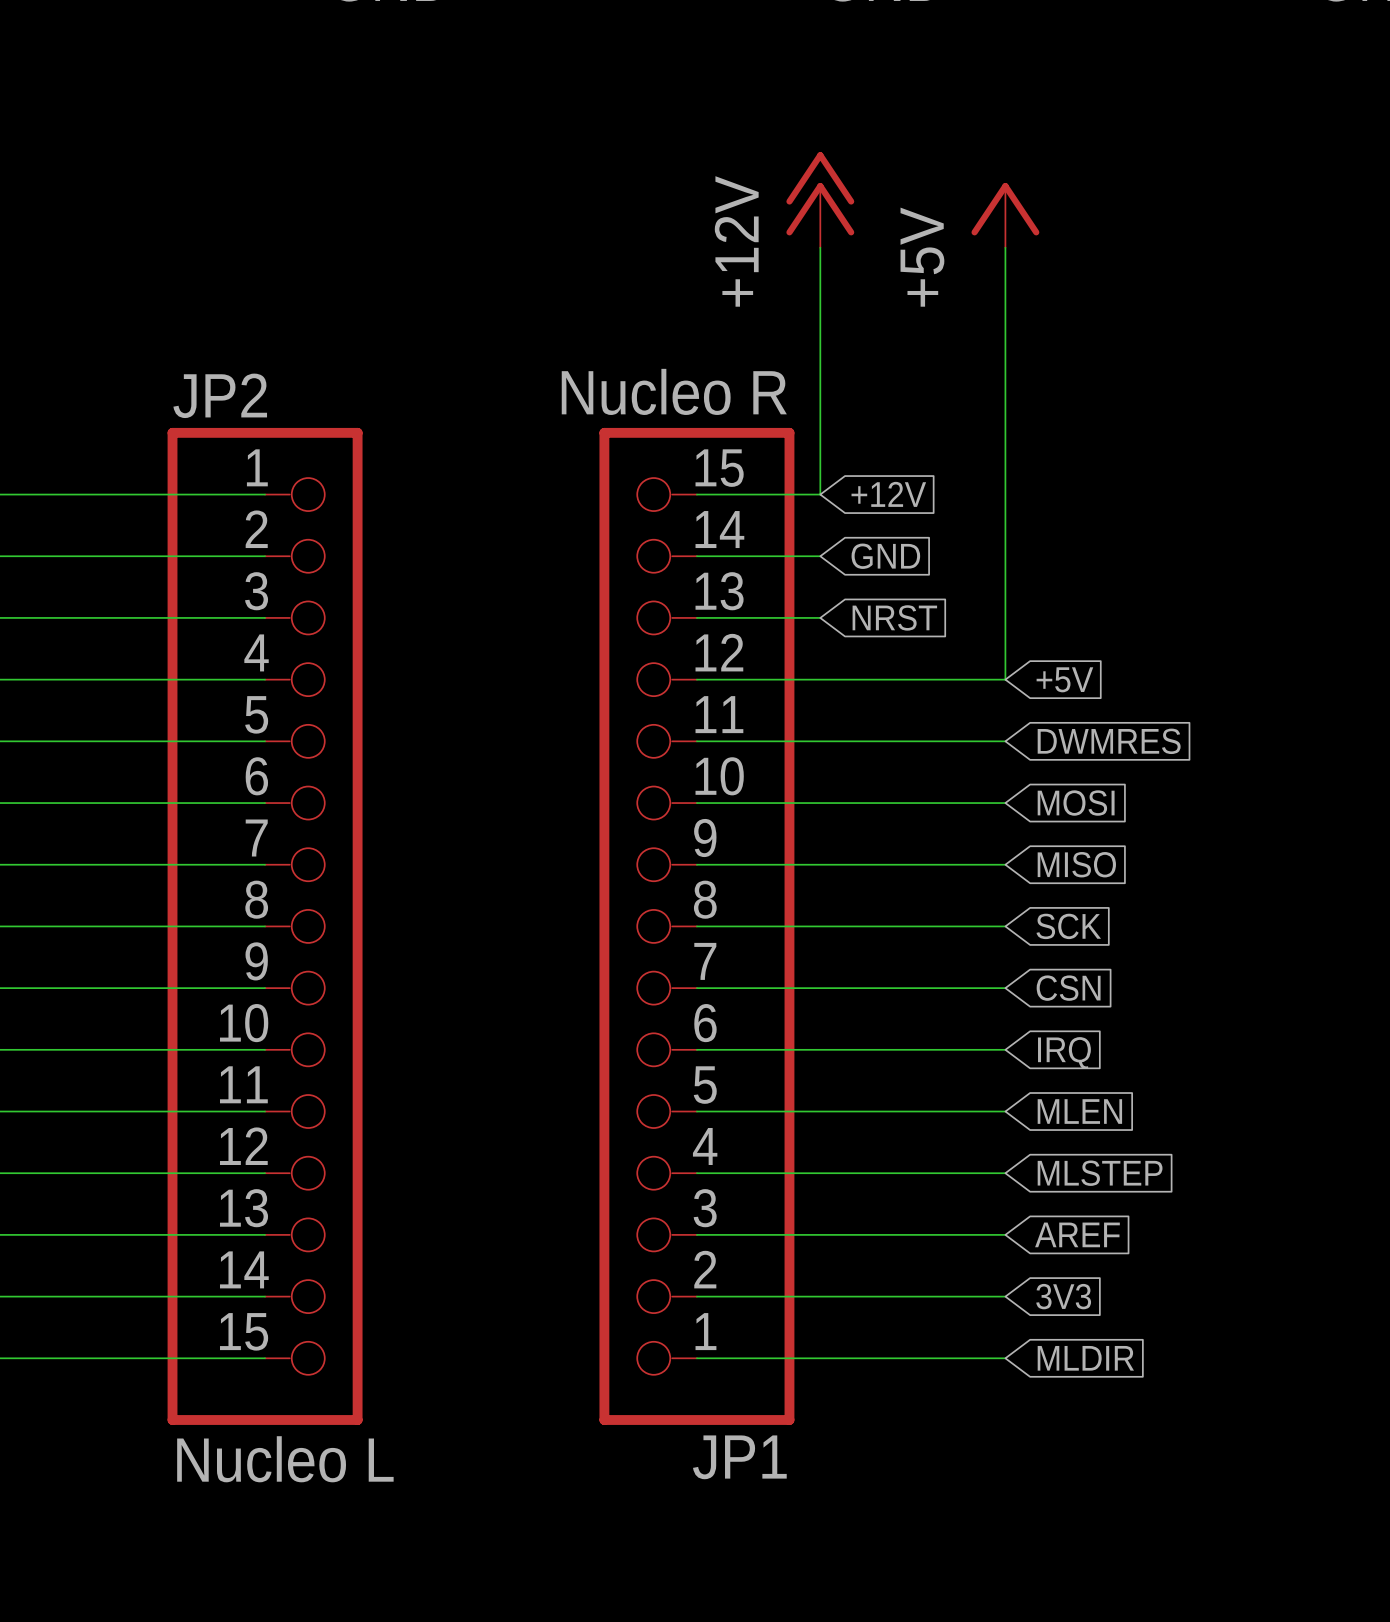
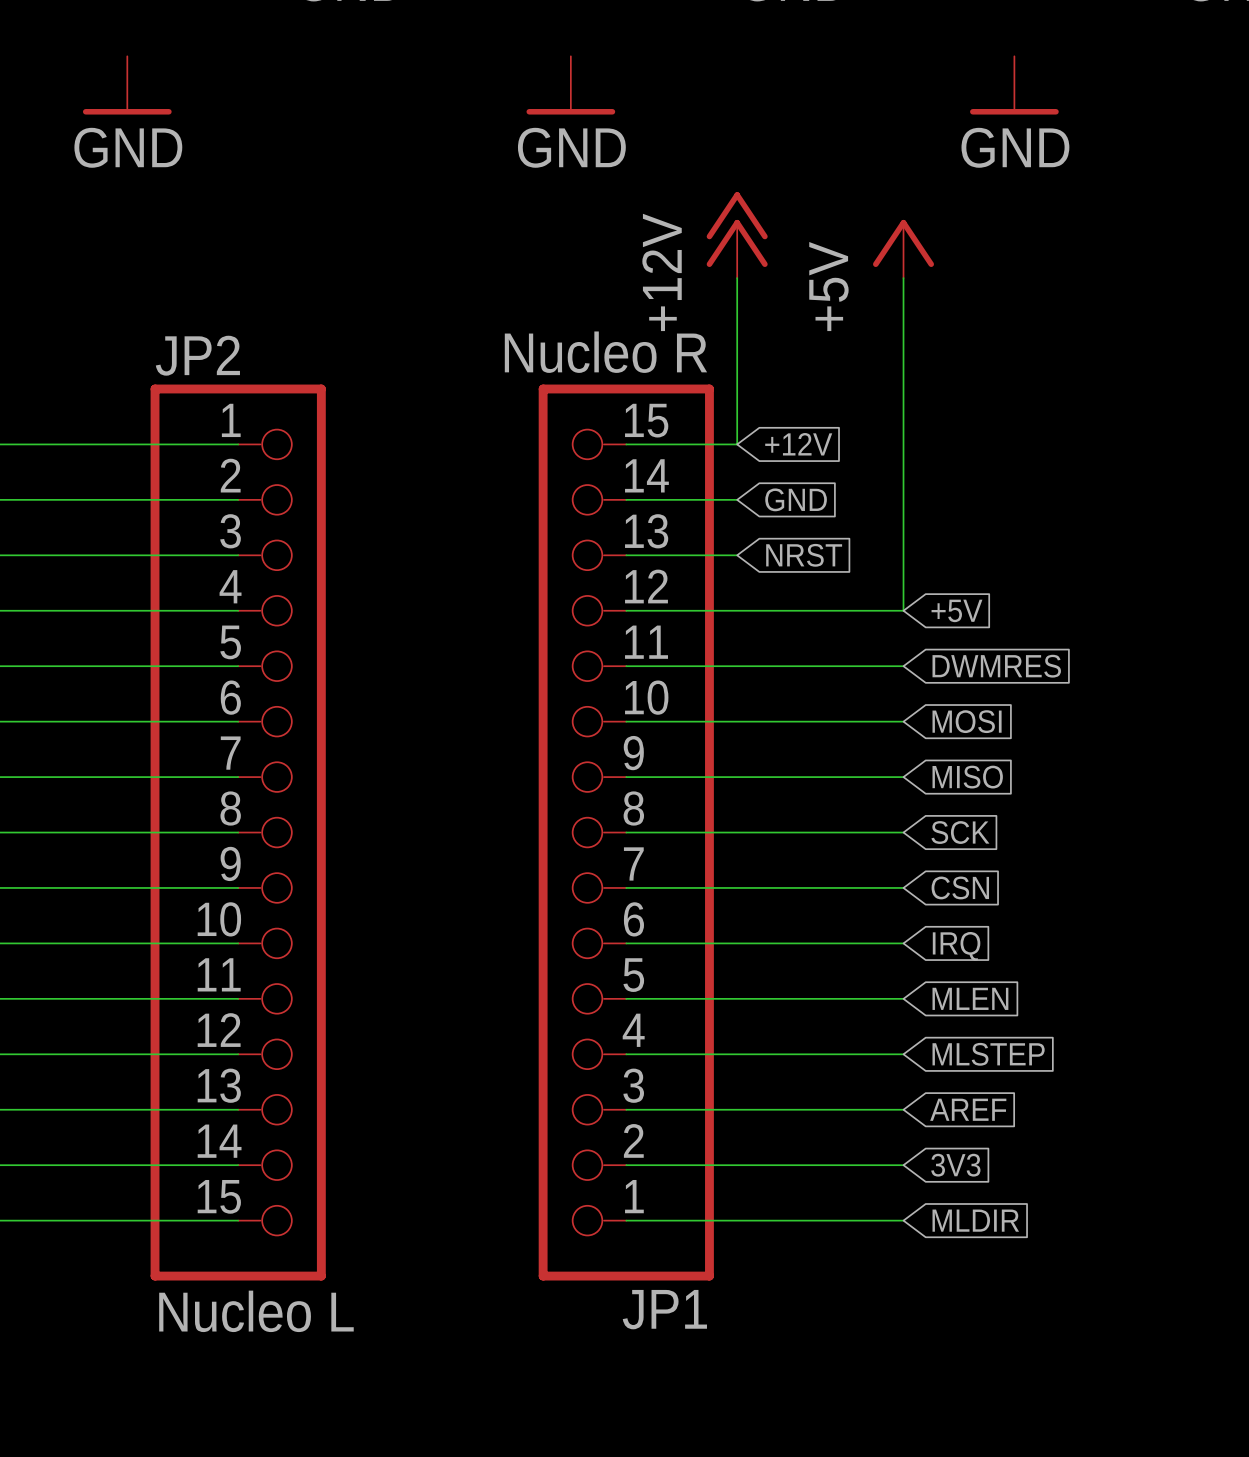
power symbol: none -> GND (127, 85)
power symbol: none -> GND (570, 85)
power symbol: none -> GND (1014, 85)
power symbol position: +12V (820, 199) -> +12V (737, 235)
power symbol position: +5V (1005, 215) -> +5V (903, 248)

